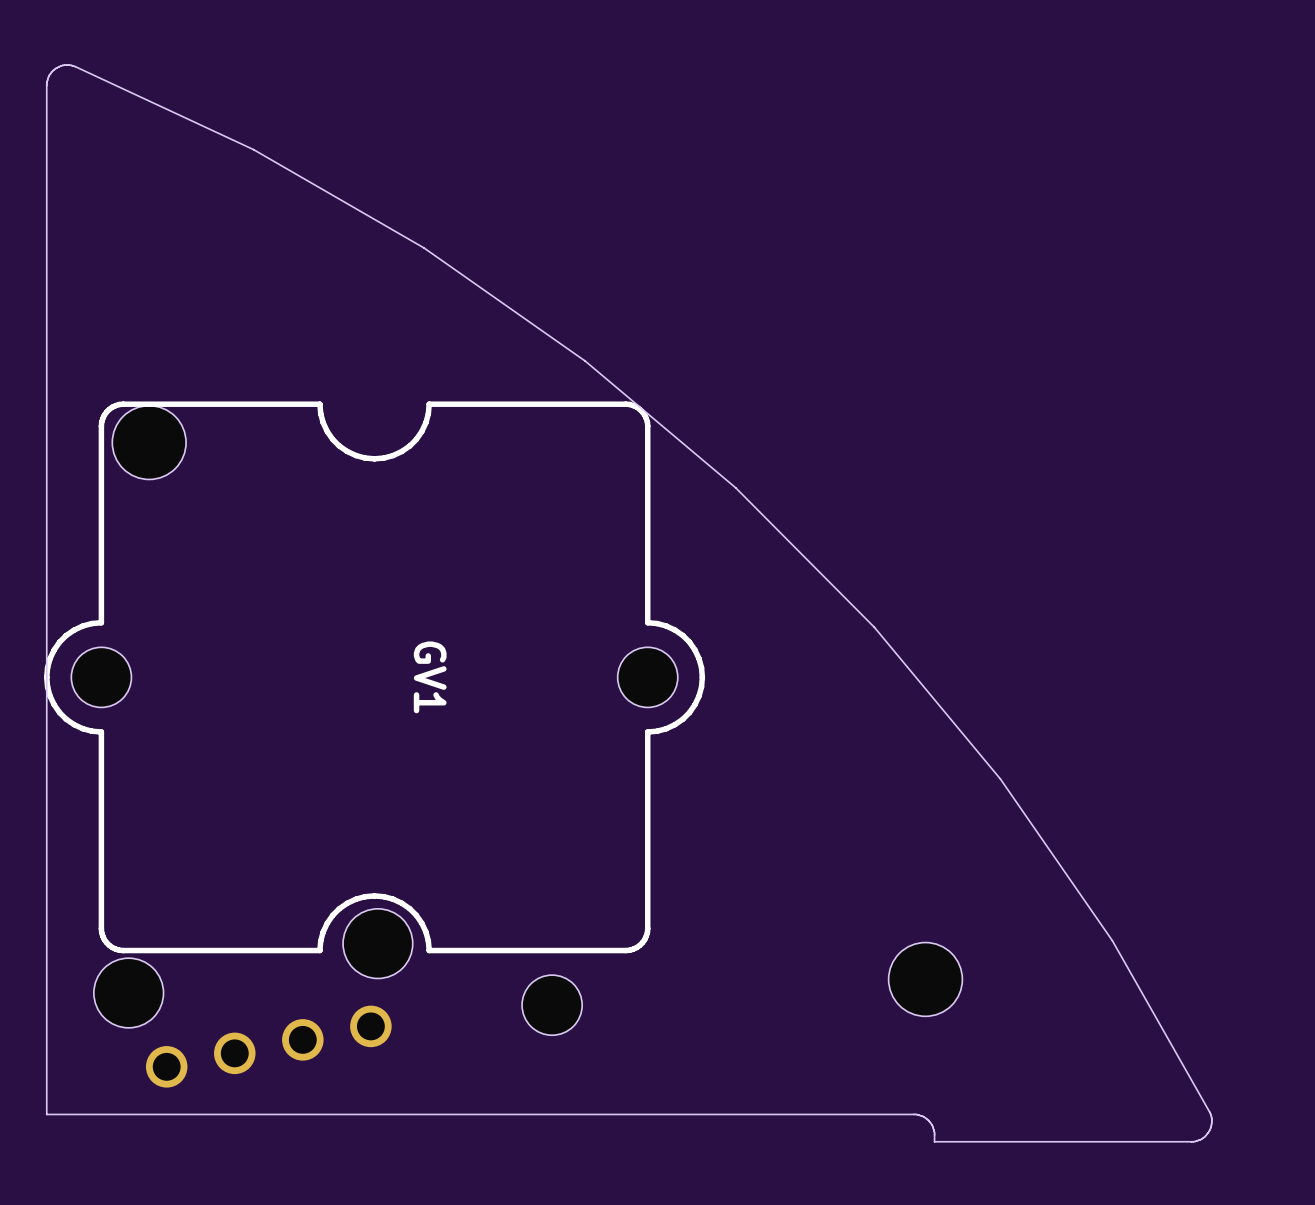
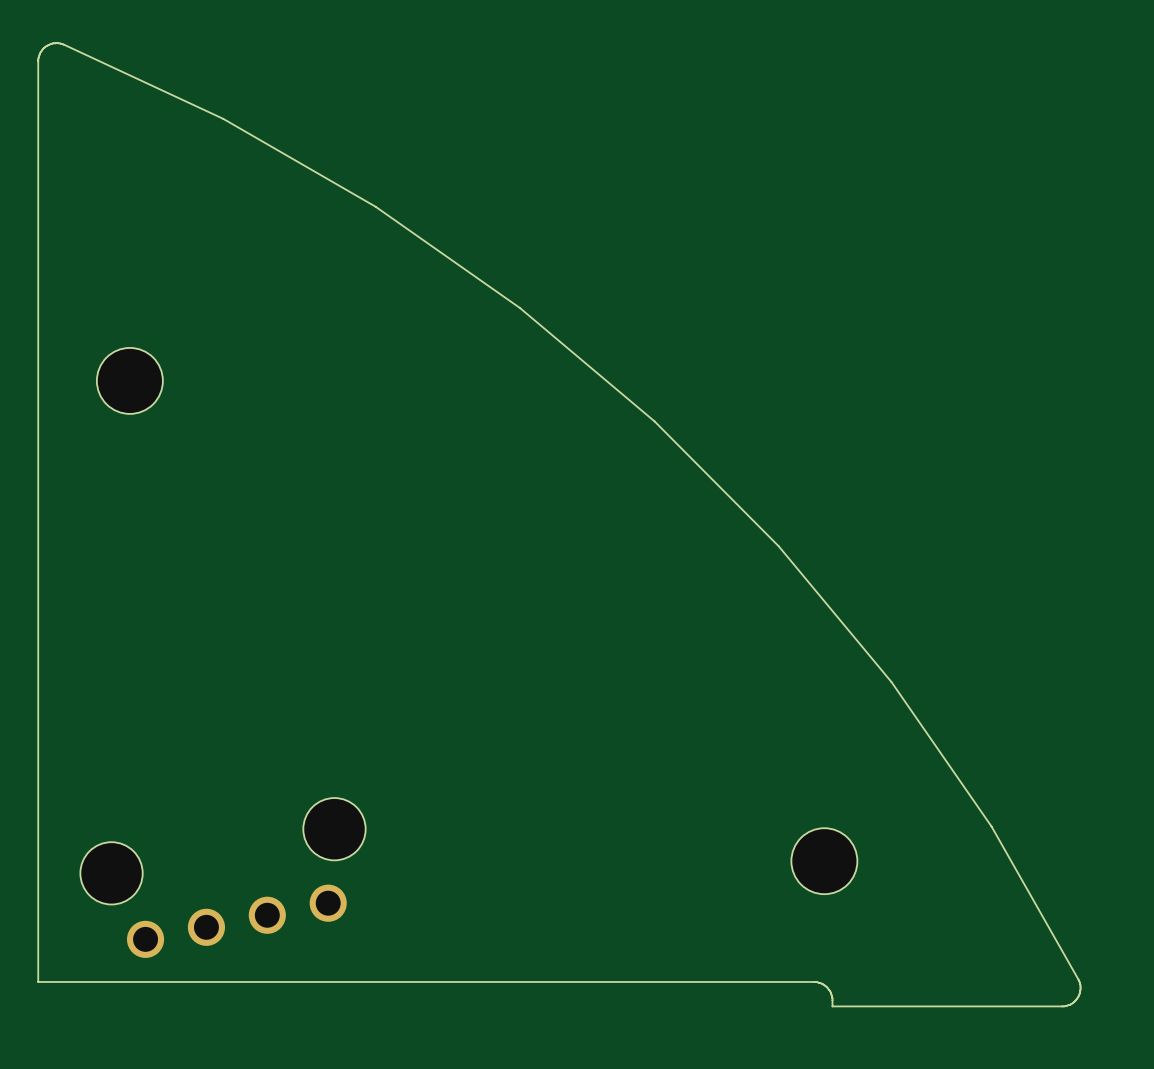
GV1: (374, 677) -> none
part: (552, 1005) -> none

